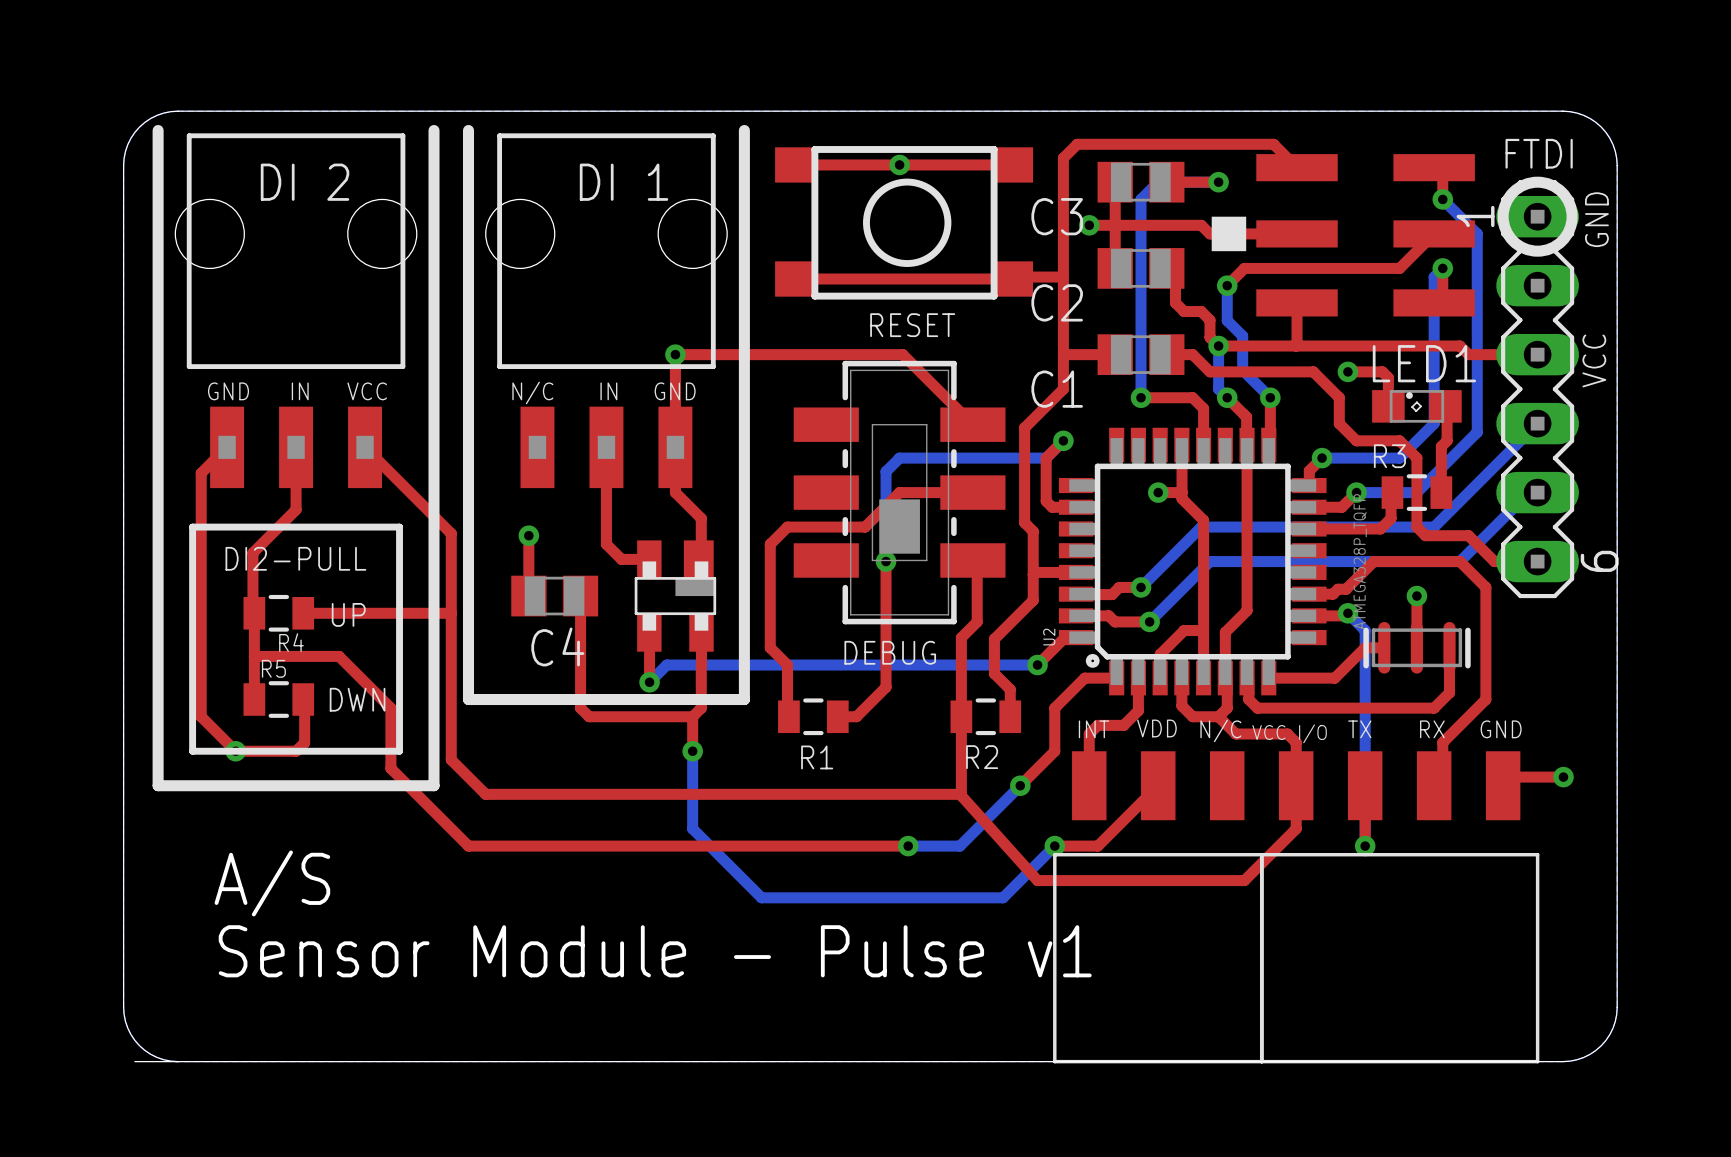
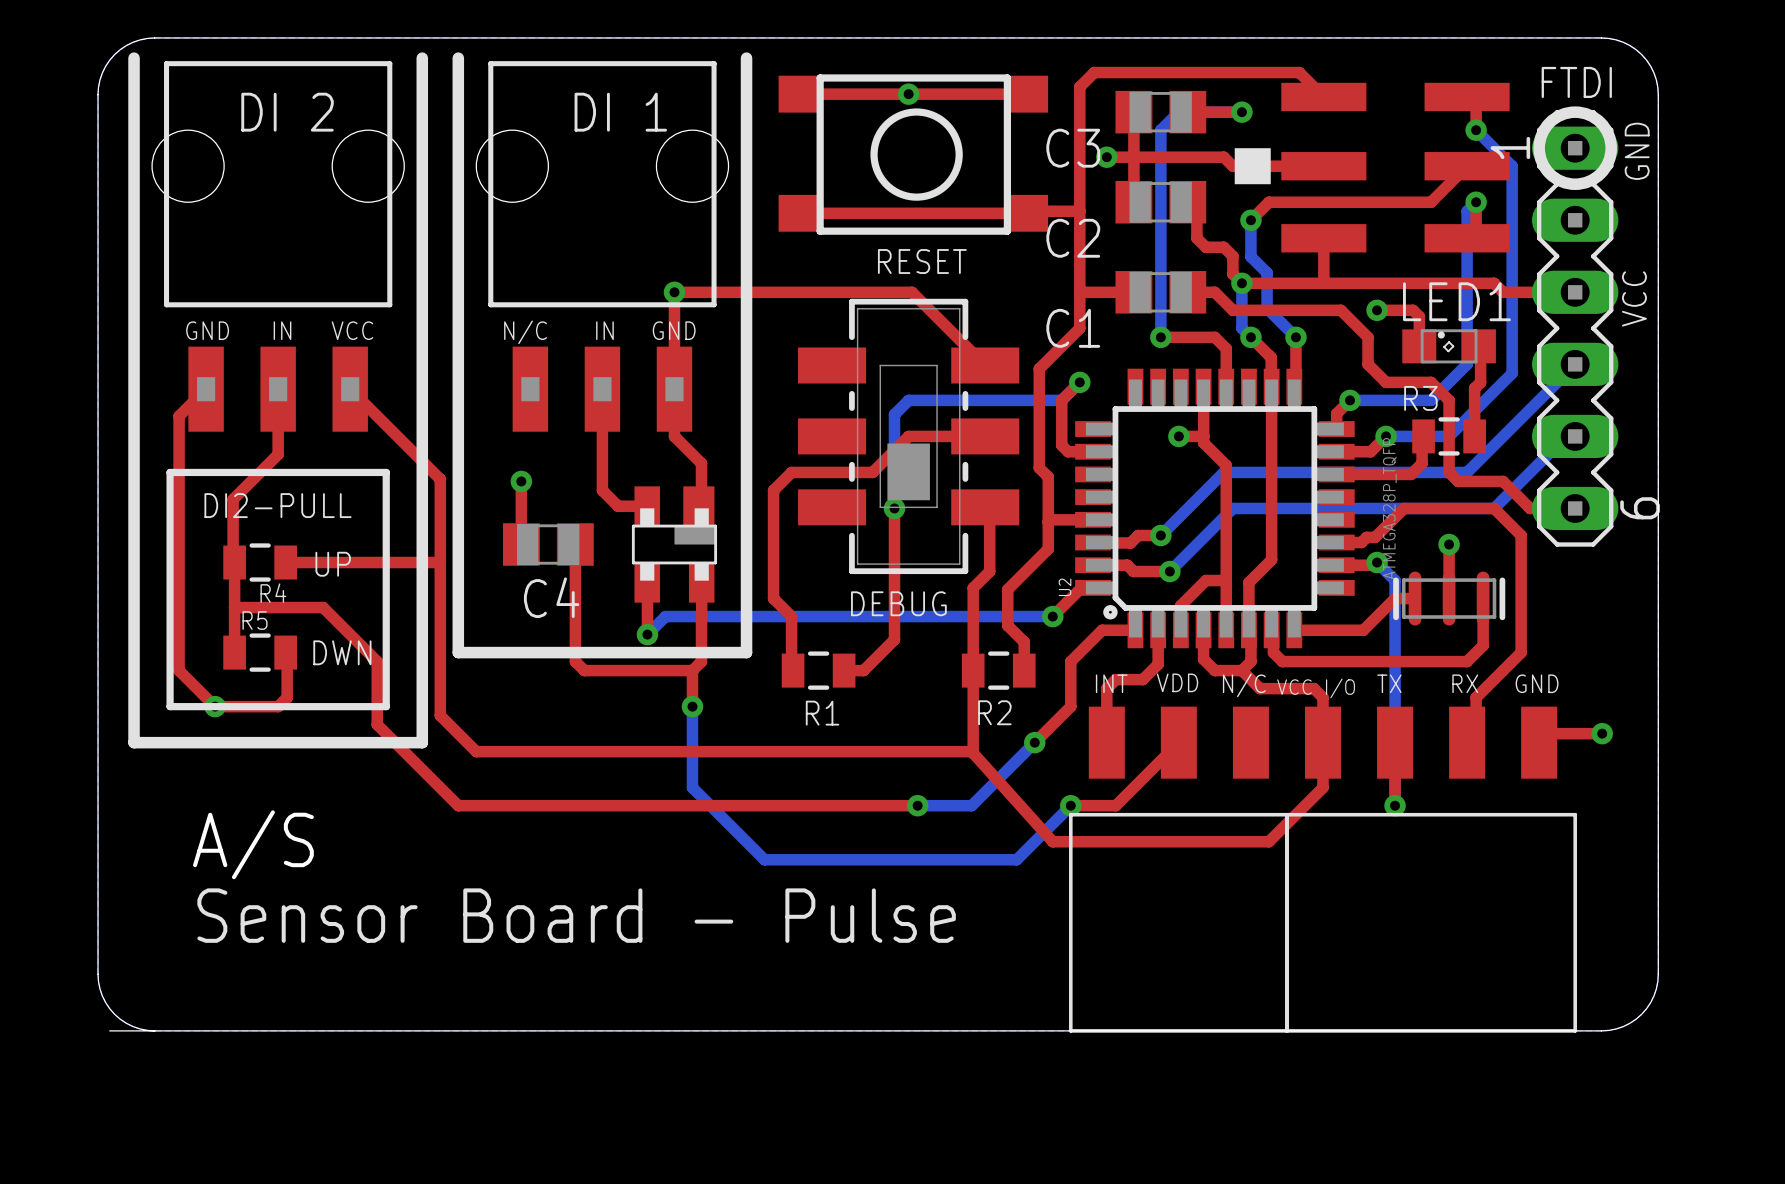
text: Sensor Module - Pulse v1 (655, 951) -> Sensor Board - Pulse (576, 915)

